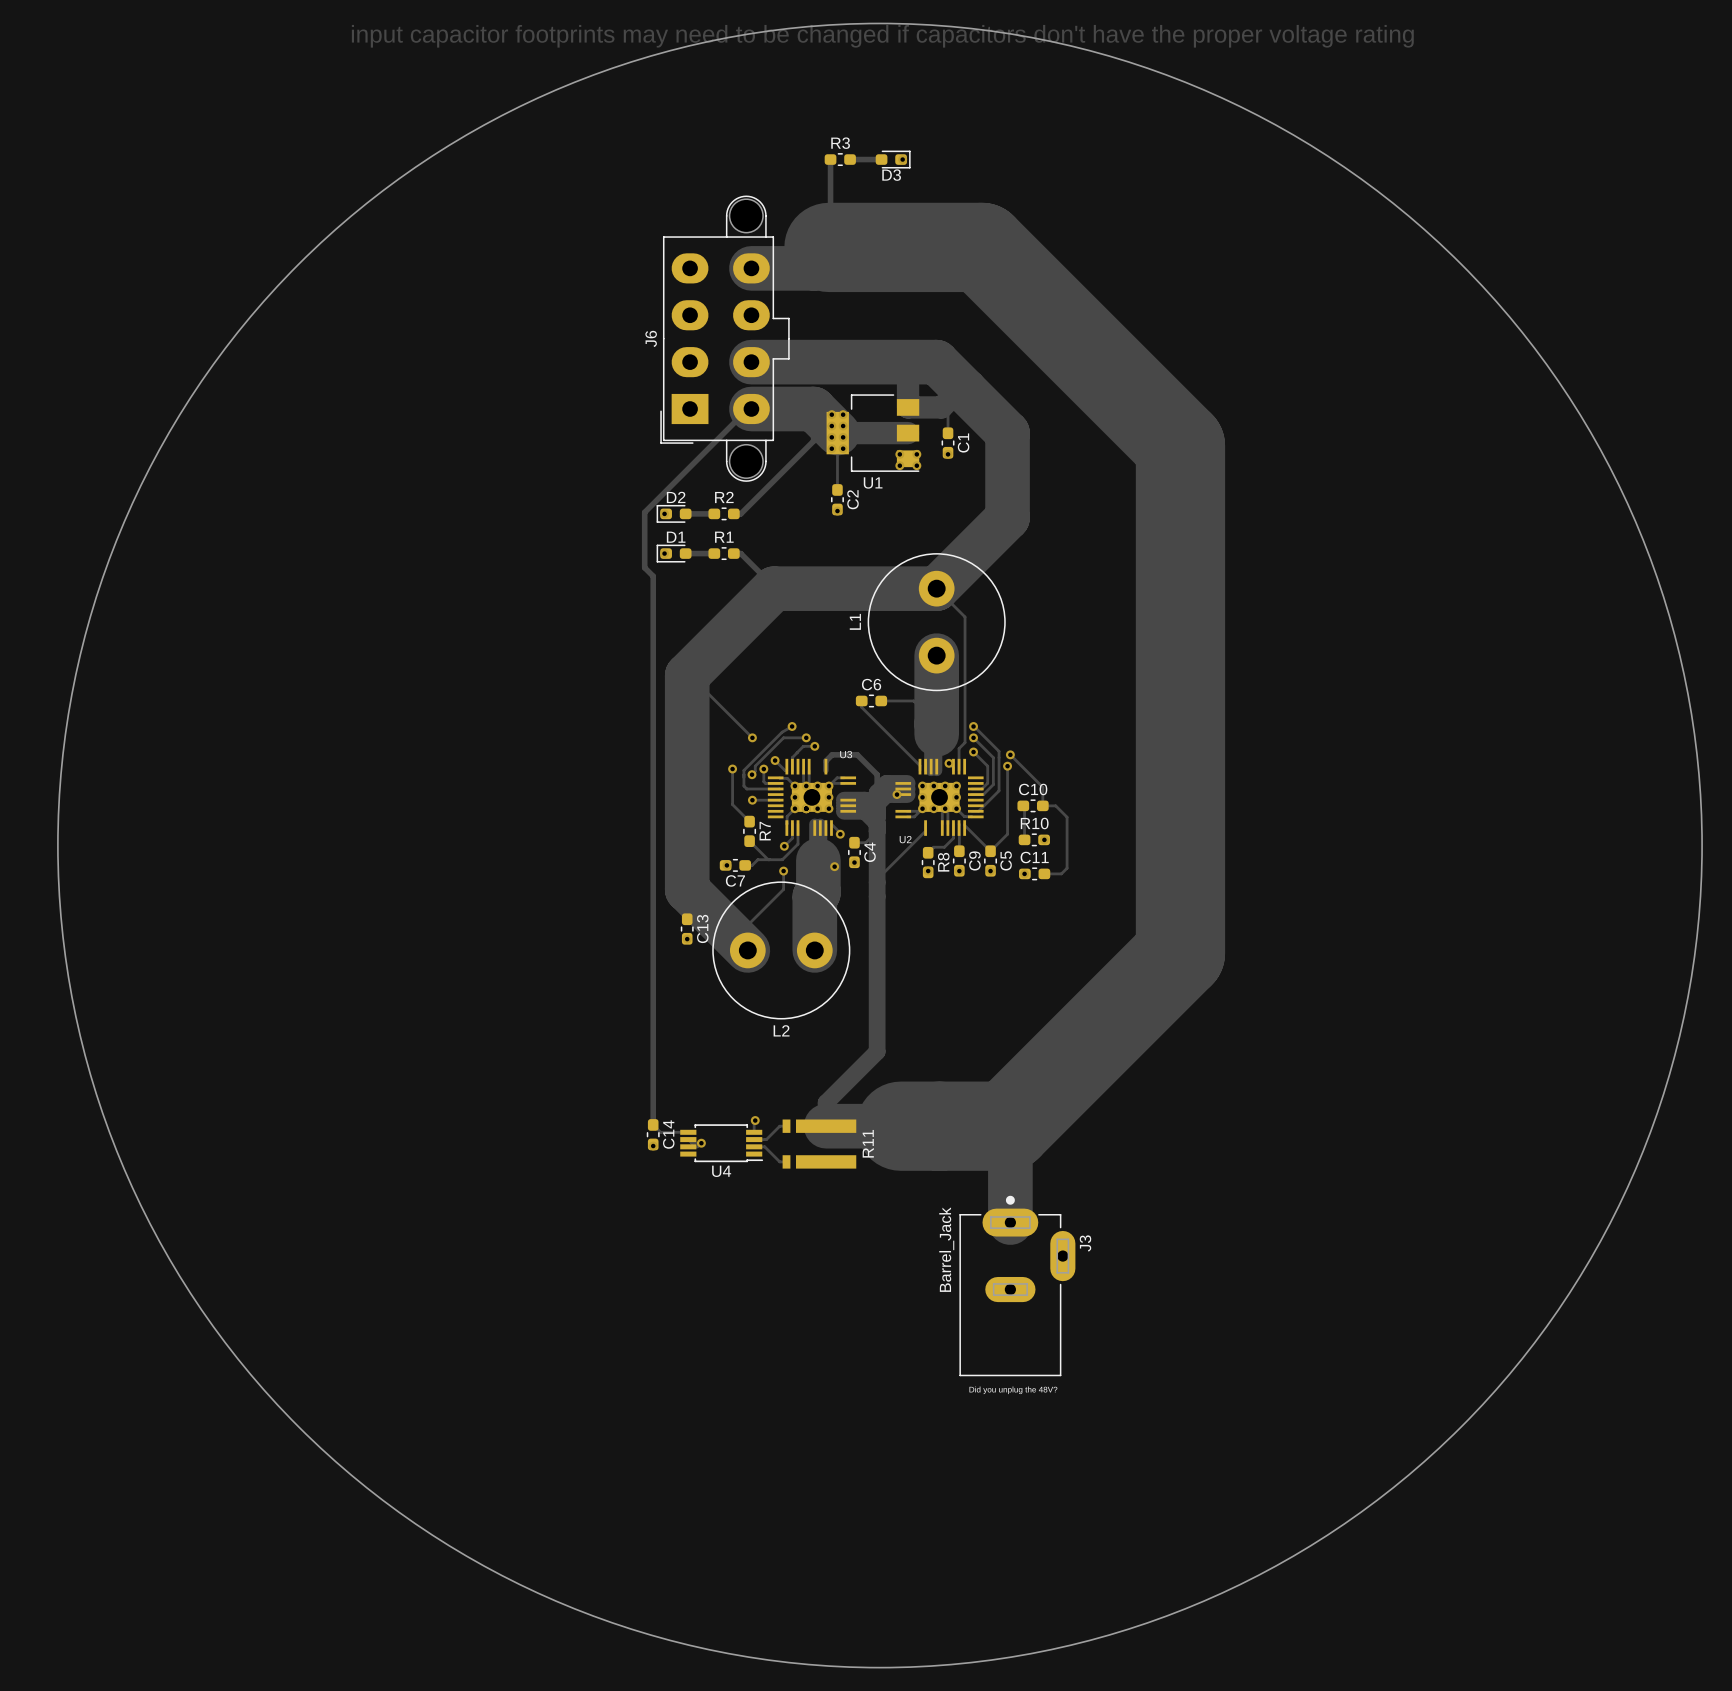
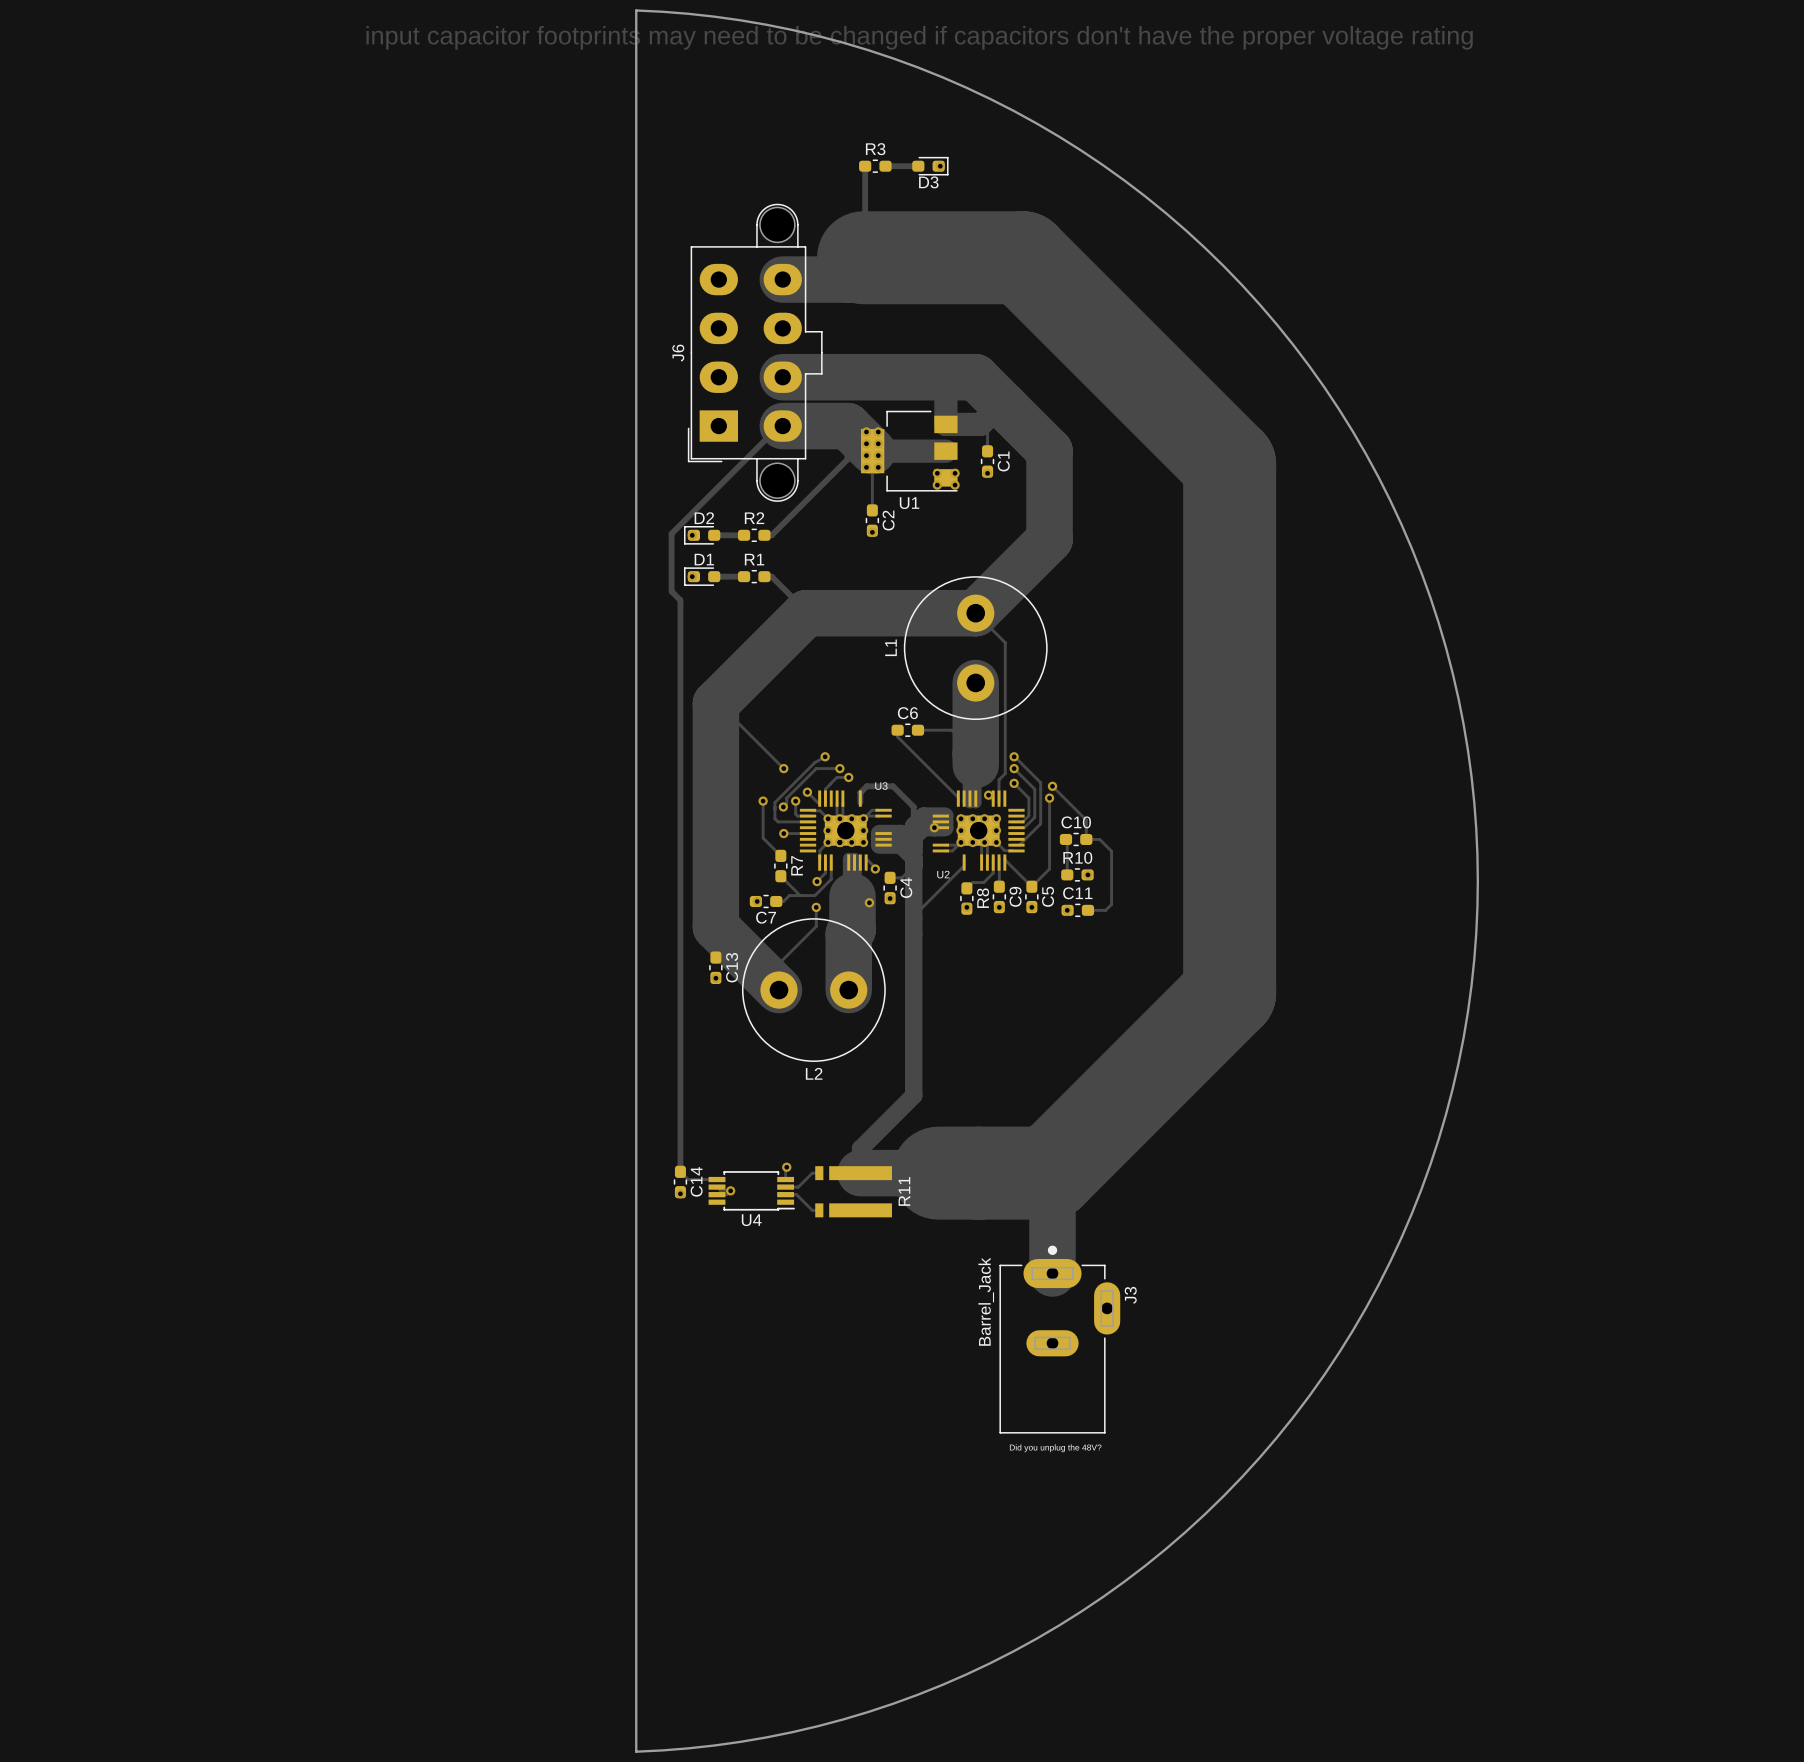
board edge: none -> (636, 10) (636, 1751) (714, 1745) (792, 1732) (843, 1719) (893, 1703) (966, 1674) (1036, 1638) (1103, 1596) (1165, 1549) (1223, 1495) (1276, 1437) (1309, 1396) (1338, 1353) (1378, 1285) (1411, 1213) (1438, 1139) (1458, 1063) (1467, 1011) (1474, 959) (1477, 881) (1476, 828) (1471, 776) (1458, 698) (1438, 622) (1411, 548) (1378, 477) (1338, 409) (1293, 344) (1242, 285) (1185, 230) (1124, 180) (1081, 150) (1036, 123) (966, 87) (917, 67) (868, 50) (792, 29) (714, 16) (662, 11) (636, 10)
round board edge: [57, 22, 1703, 1669] -> none

